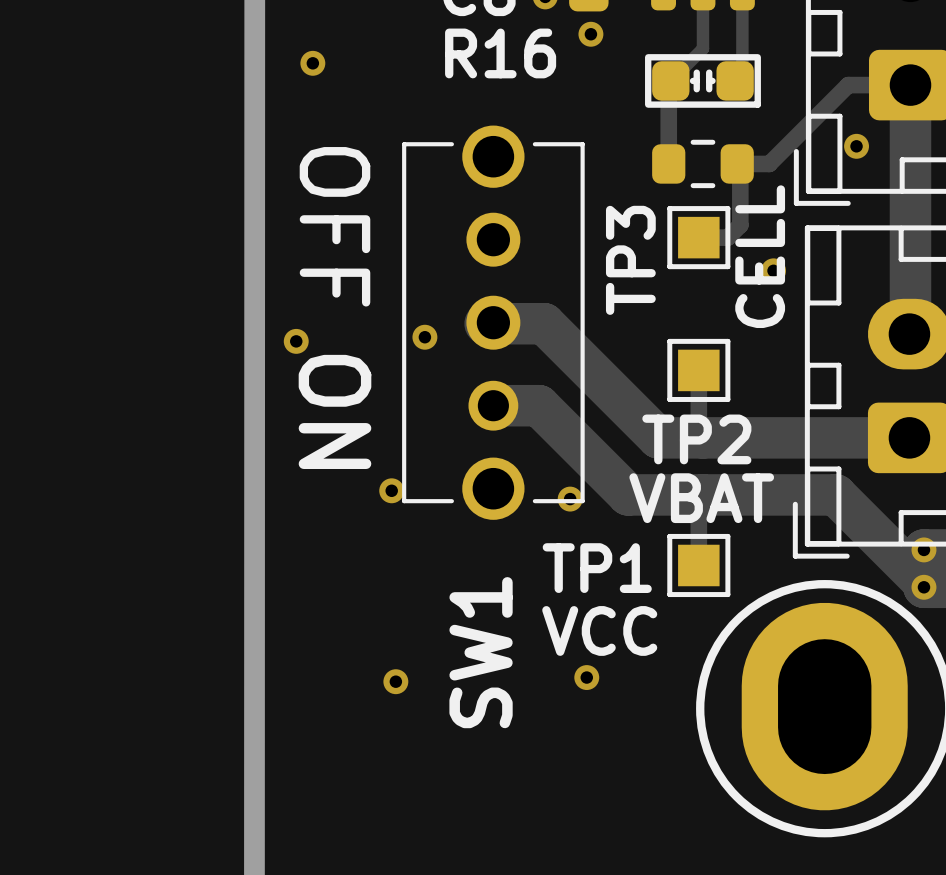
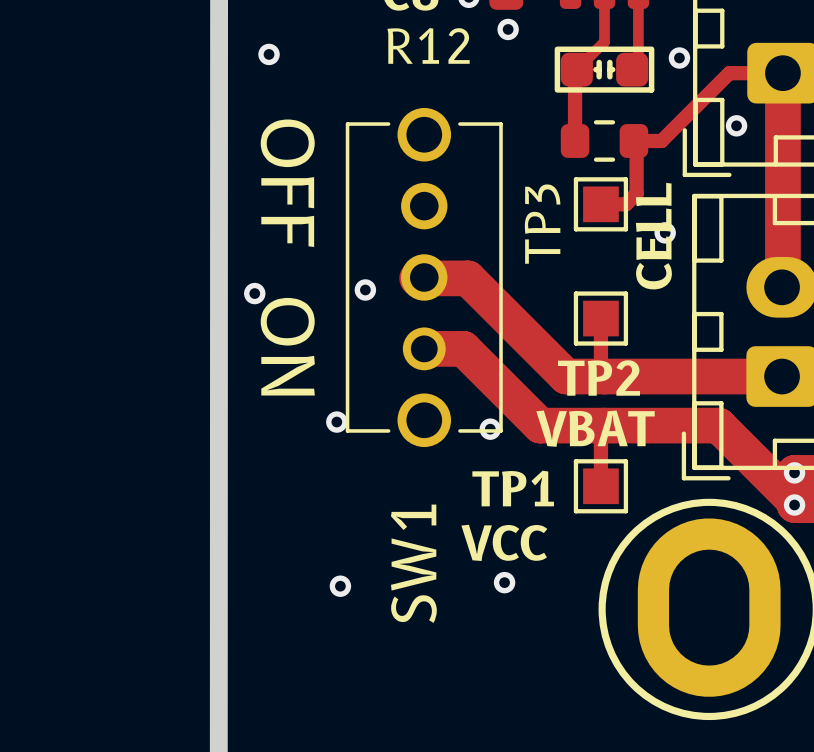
R16 name: R16 (500, 53) -> R12 (428, 45)
via: none -> (679, 58)

